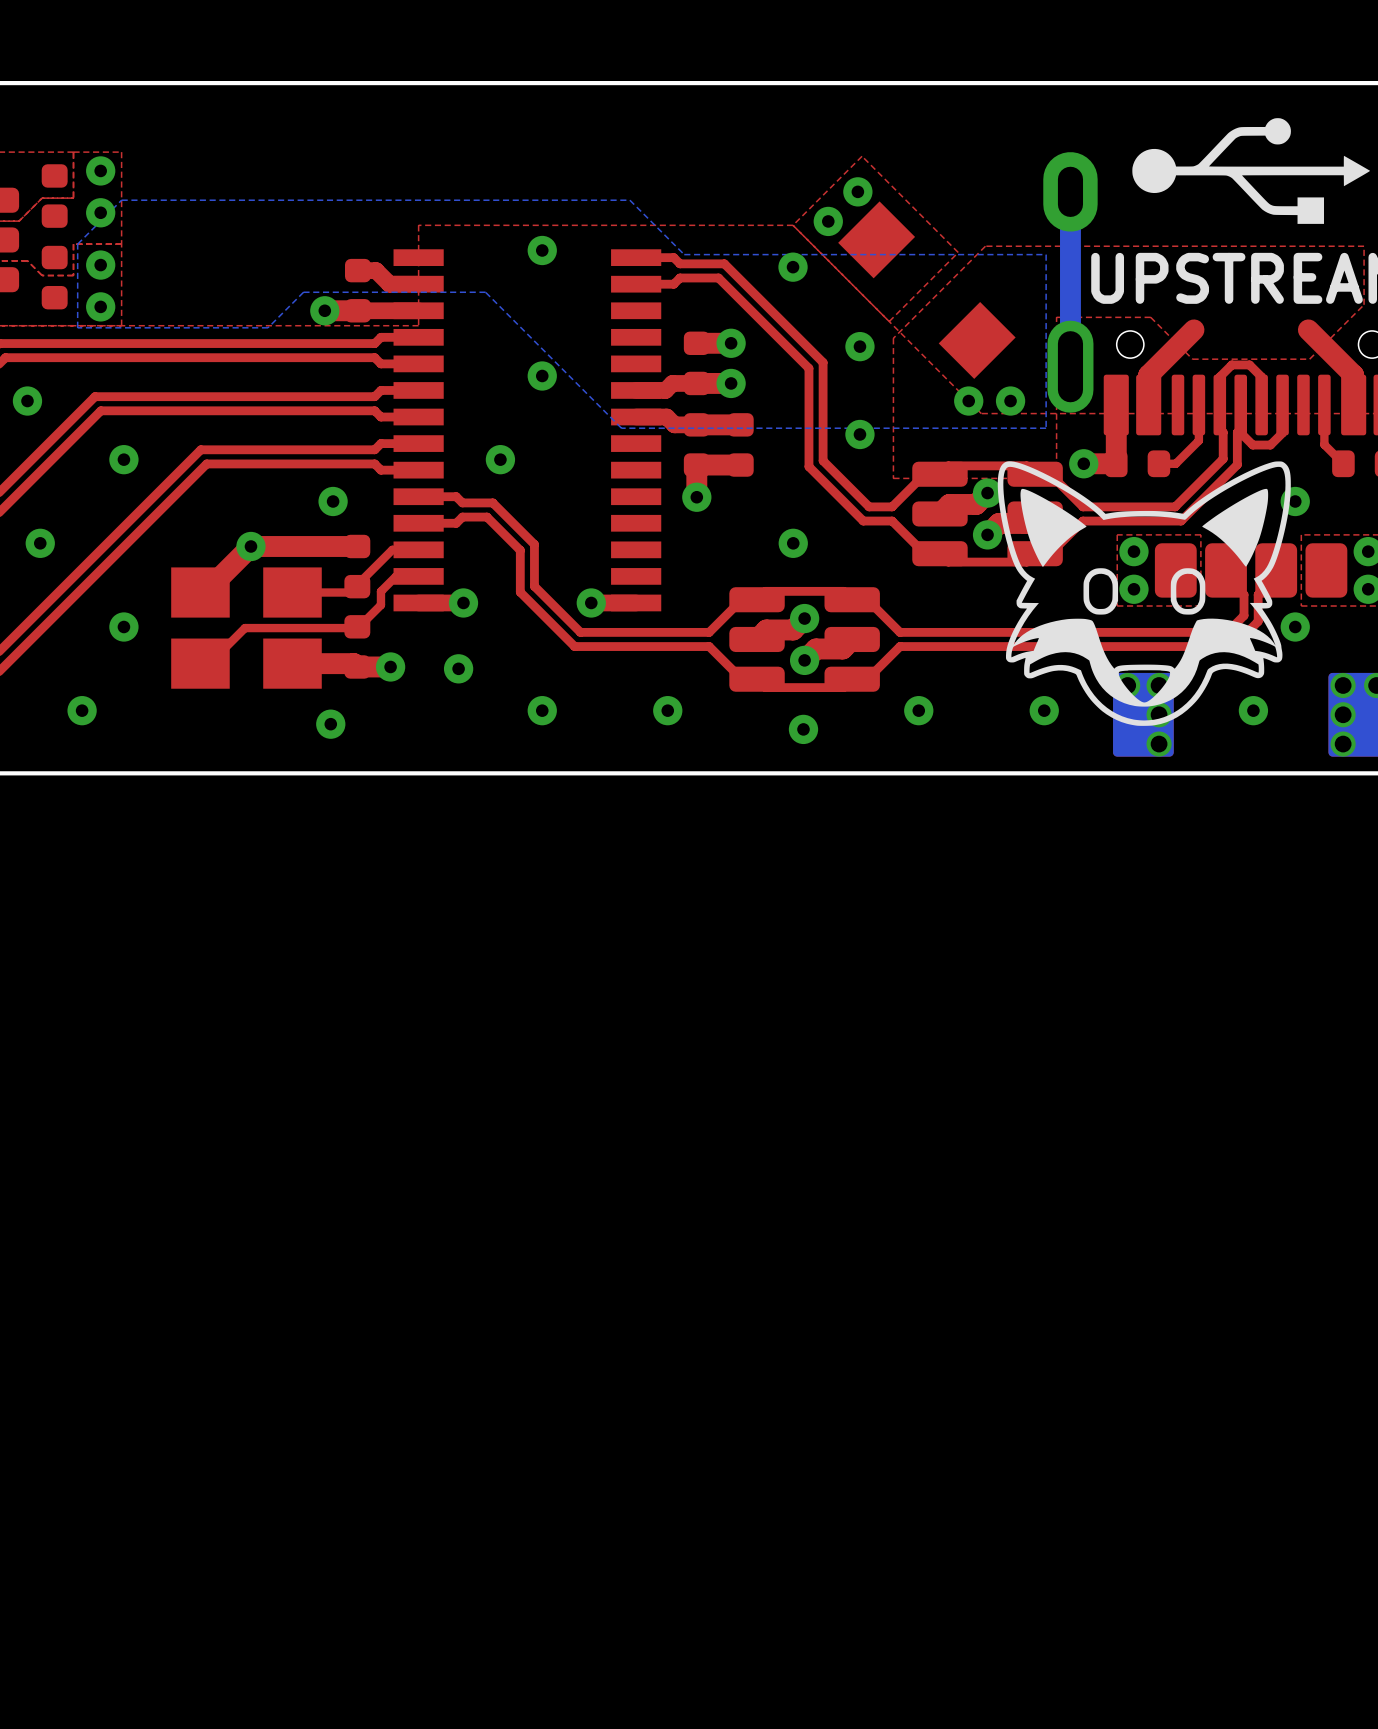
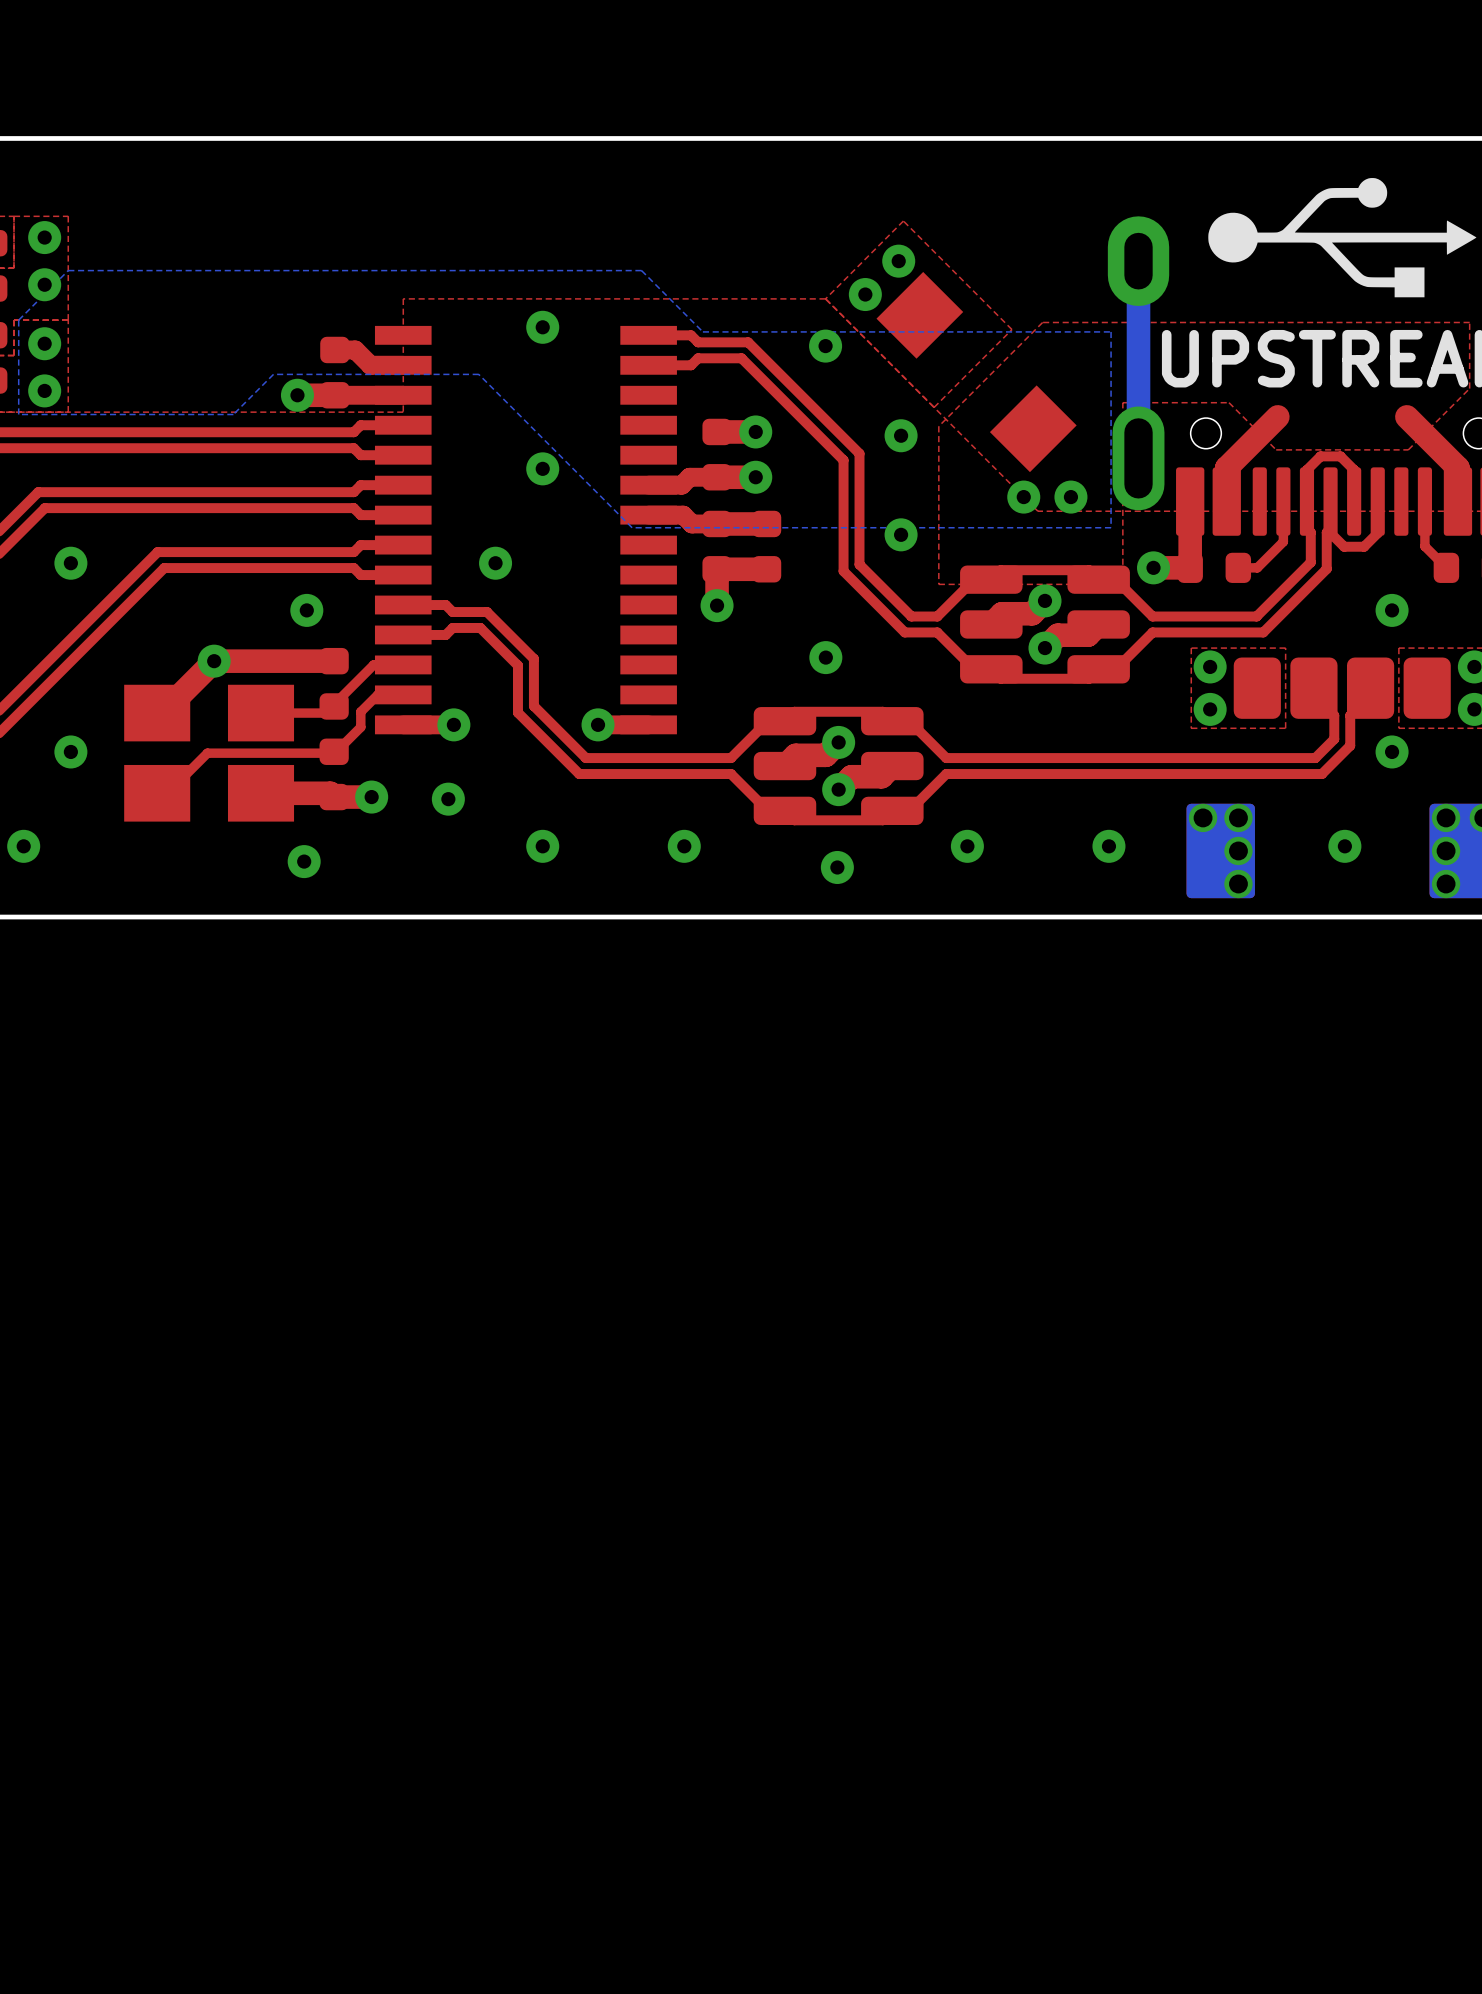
drawing: [997, 461, 1291, 726] -> none

